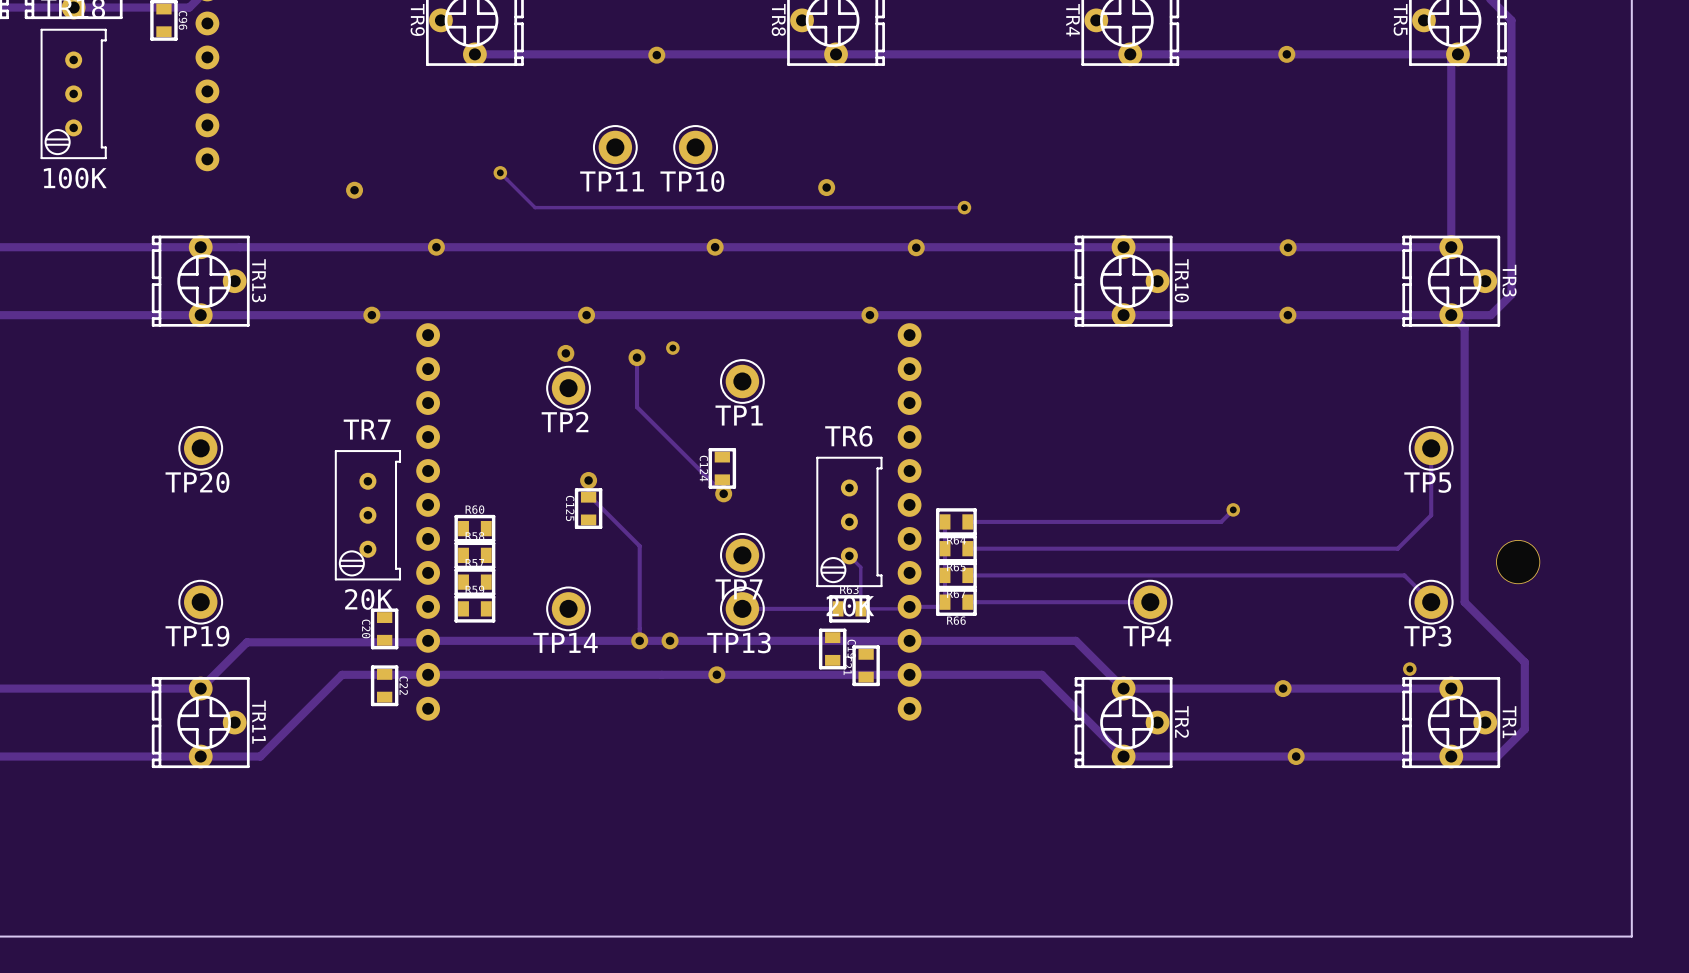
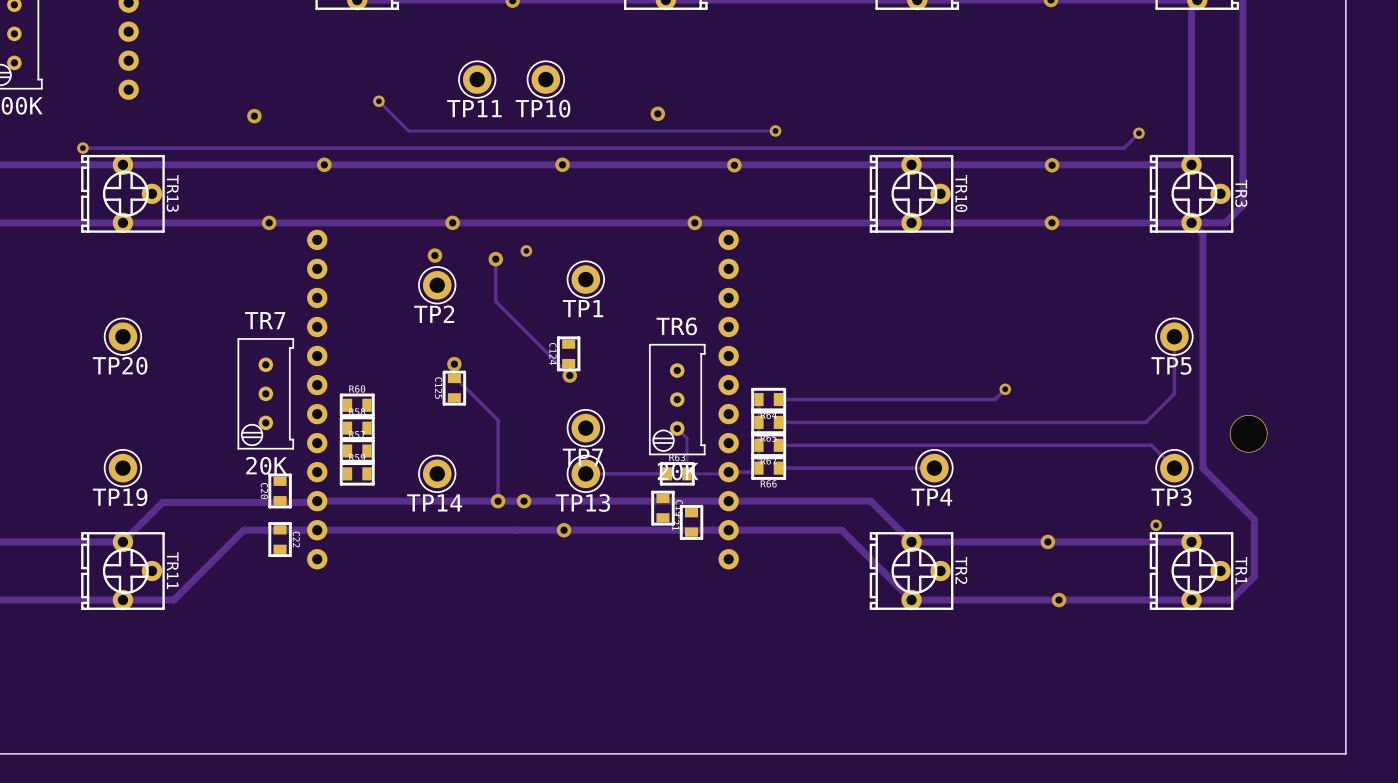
track: none -> (1138, 133) (1124, 148) (82, 148)
via: none -> (1138, 133)
via: none -> (82, 148)

